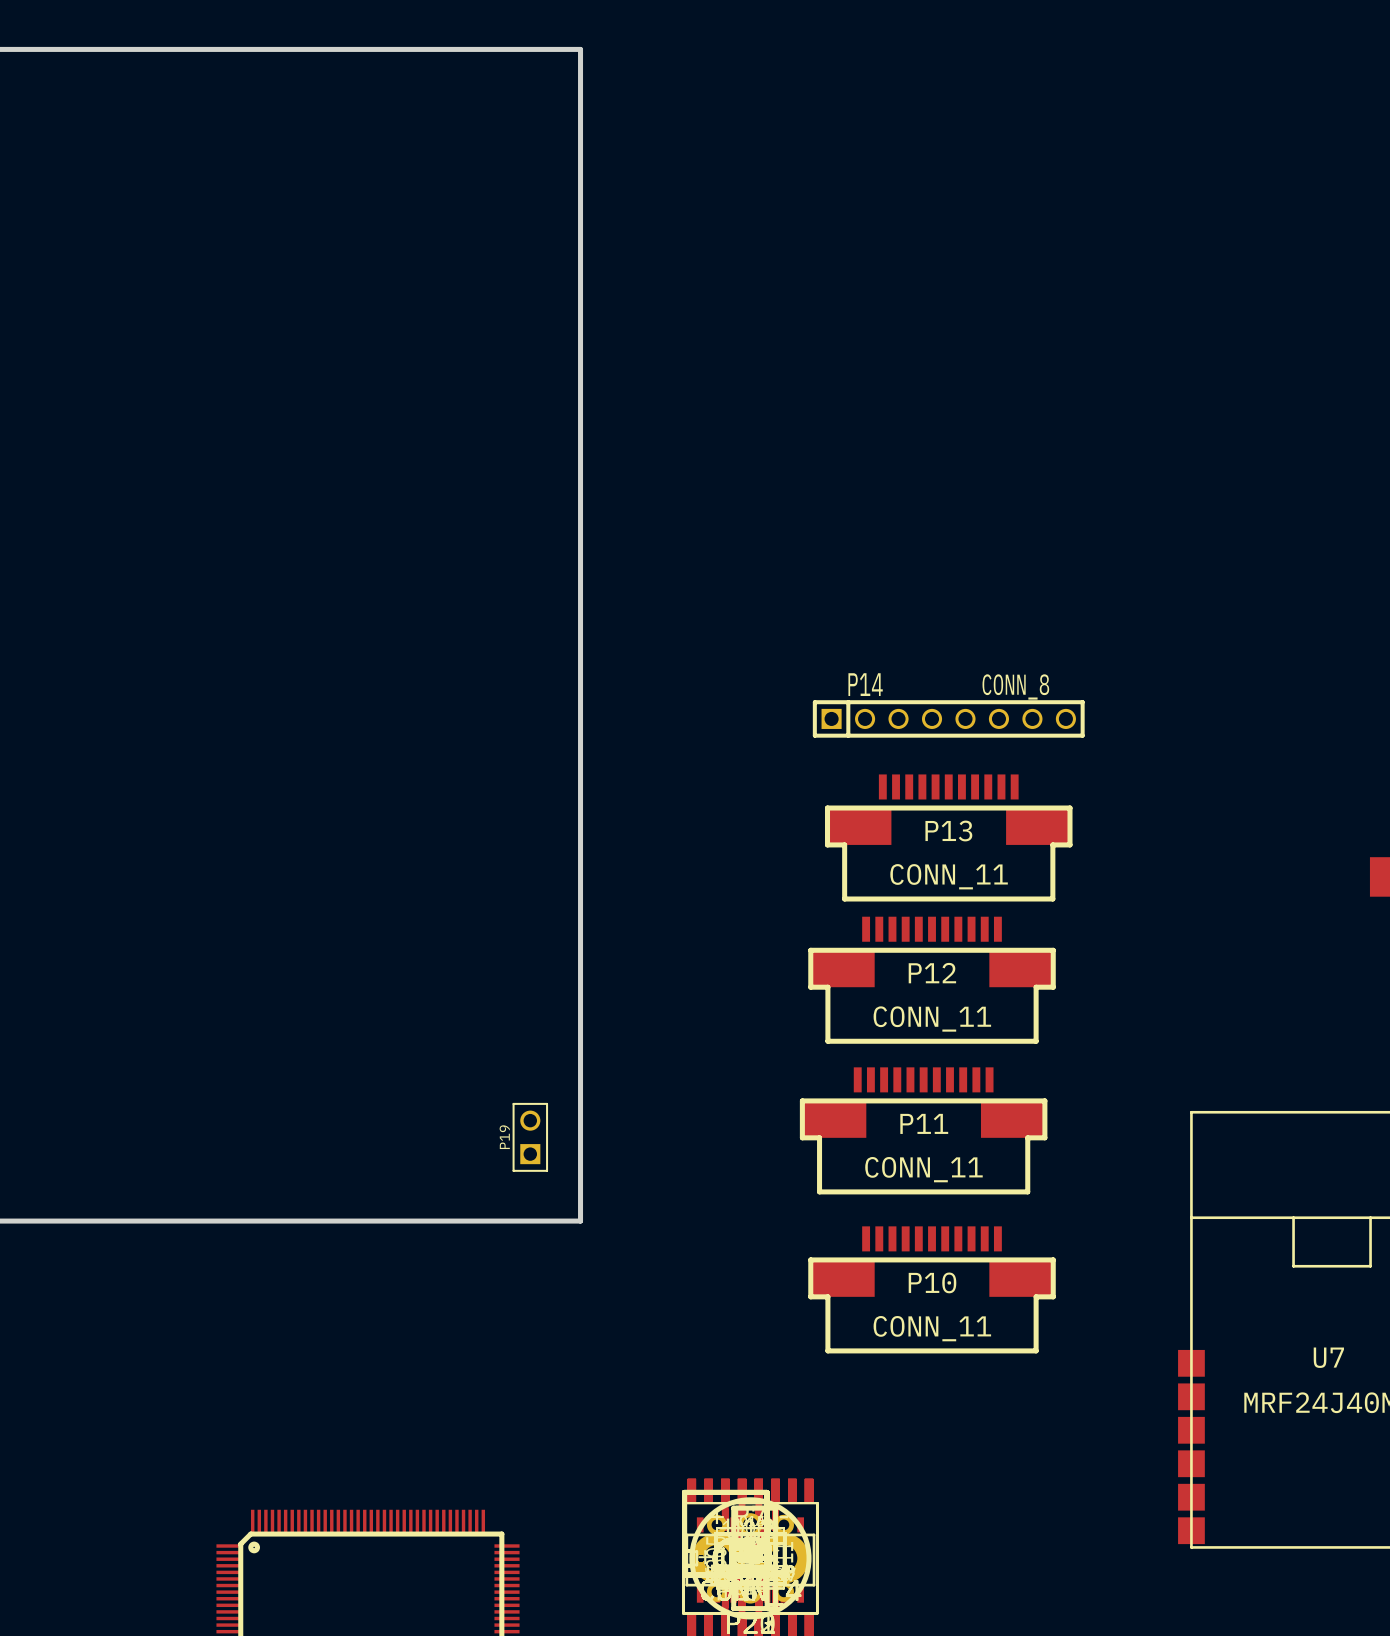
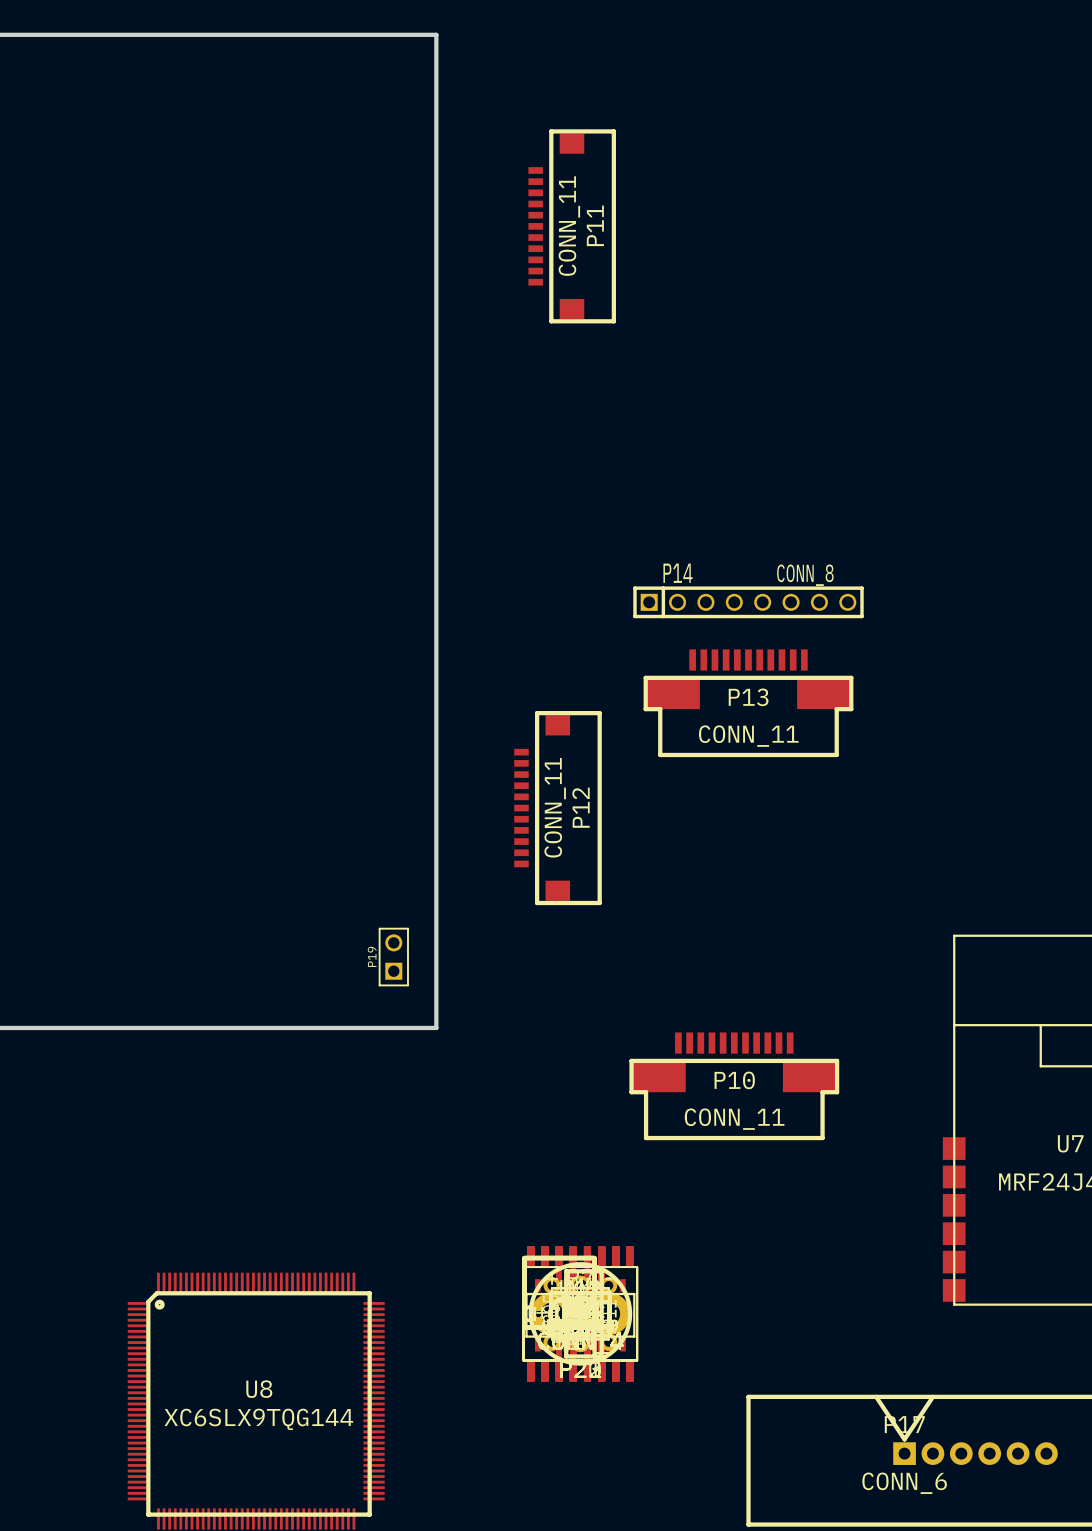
P12 footprint: [808, 916, 1056, 1044] -> [514, 710, 602, 906]
P12 name position: P12 (932, 973) -> P12 (581, 807)
P12 value position: CONN_11 (932, 1019) -> CONN_11 (555, 807)
P11 footprint: [799, 1067, 1048, 1195] -> [528, 129, 617, 324]
P11 name position: P11 (924, 1123) -> P11 (595, 225)
P11 value position: CONN_11 (923, 1169) -> CONN_11 (569, 226)

